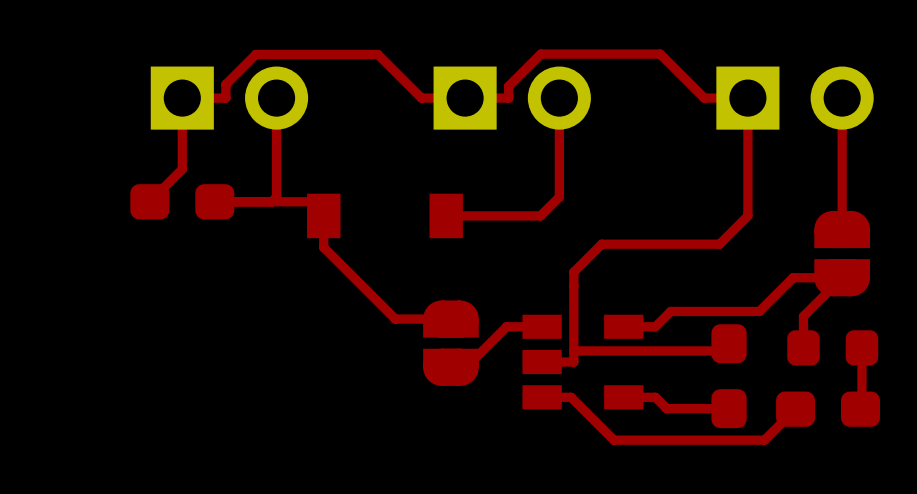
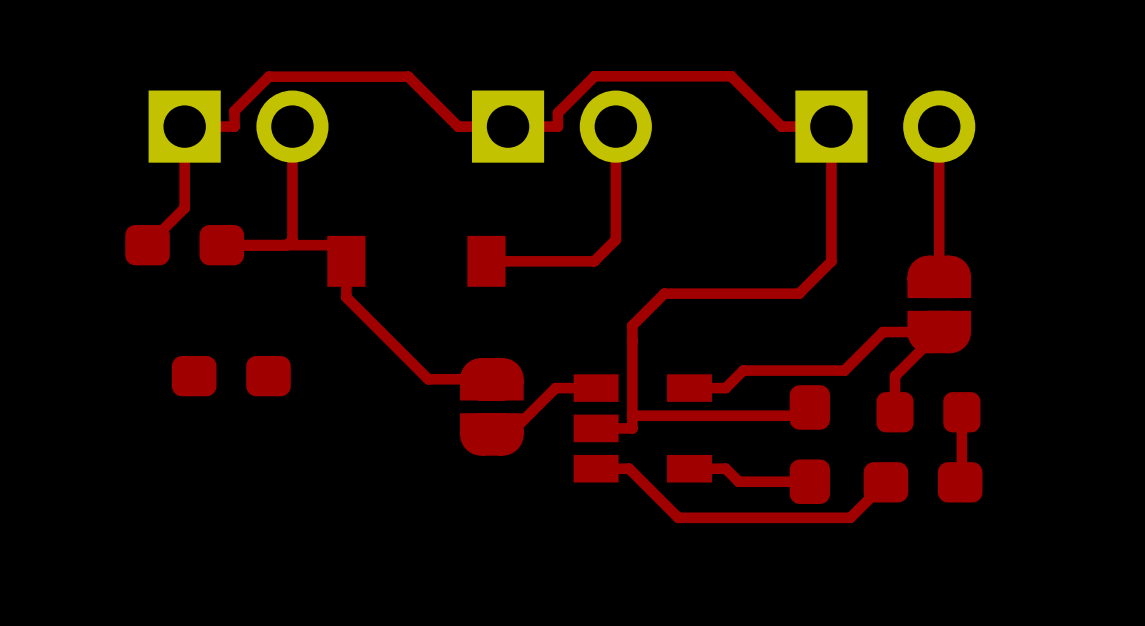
part: none -> (231, 376)

